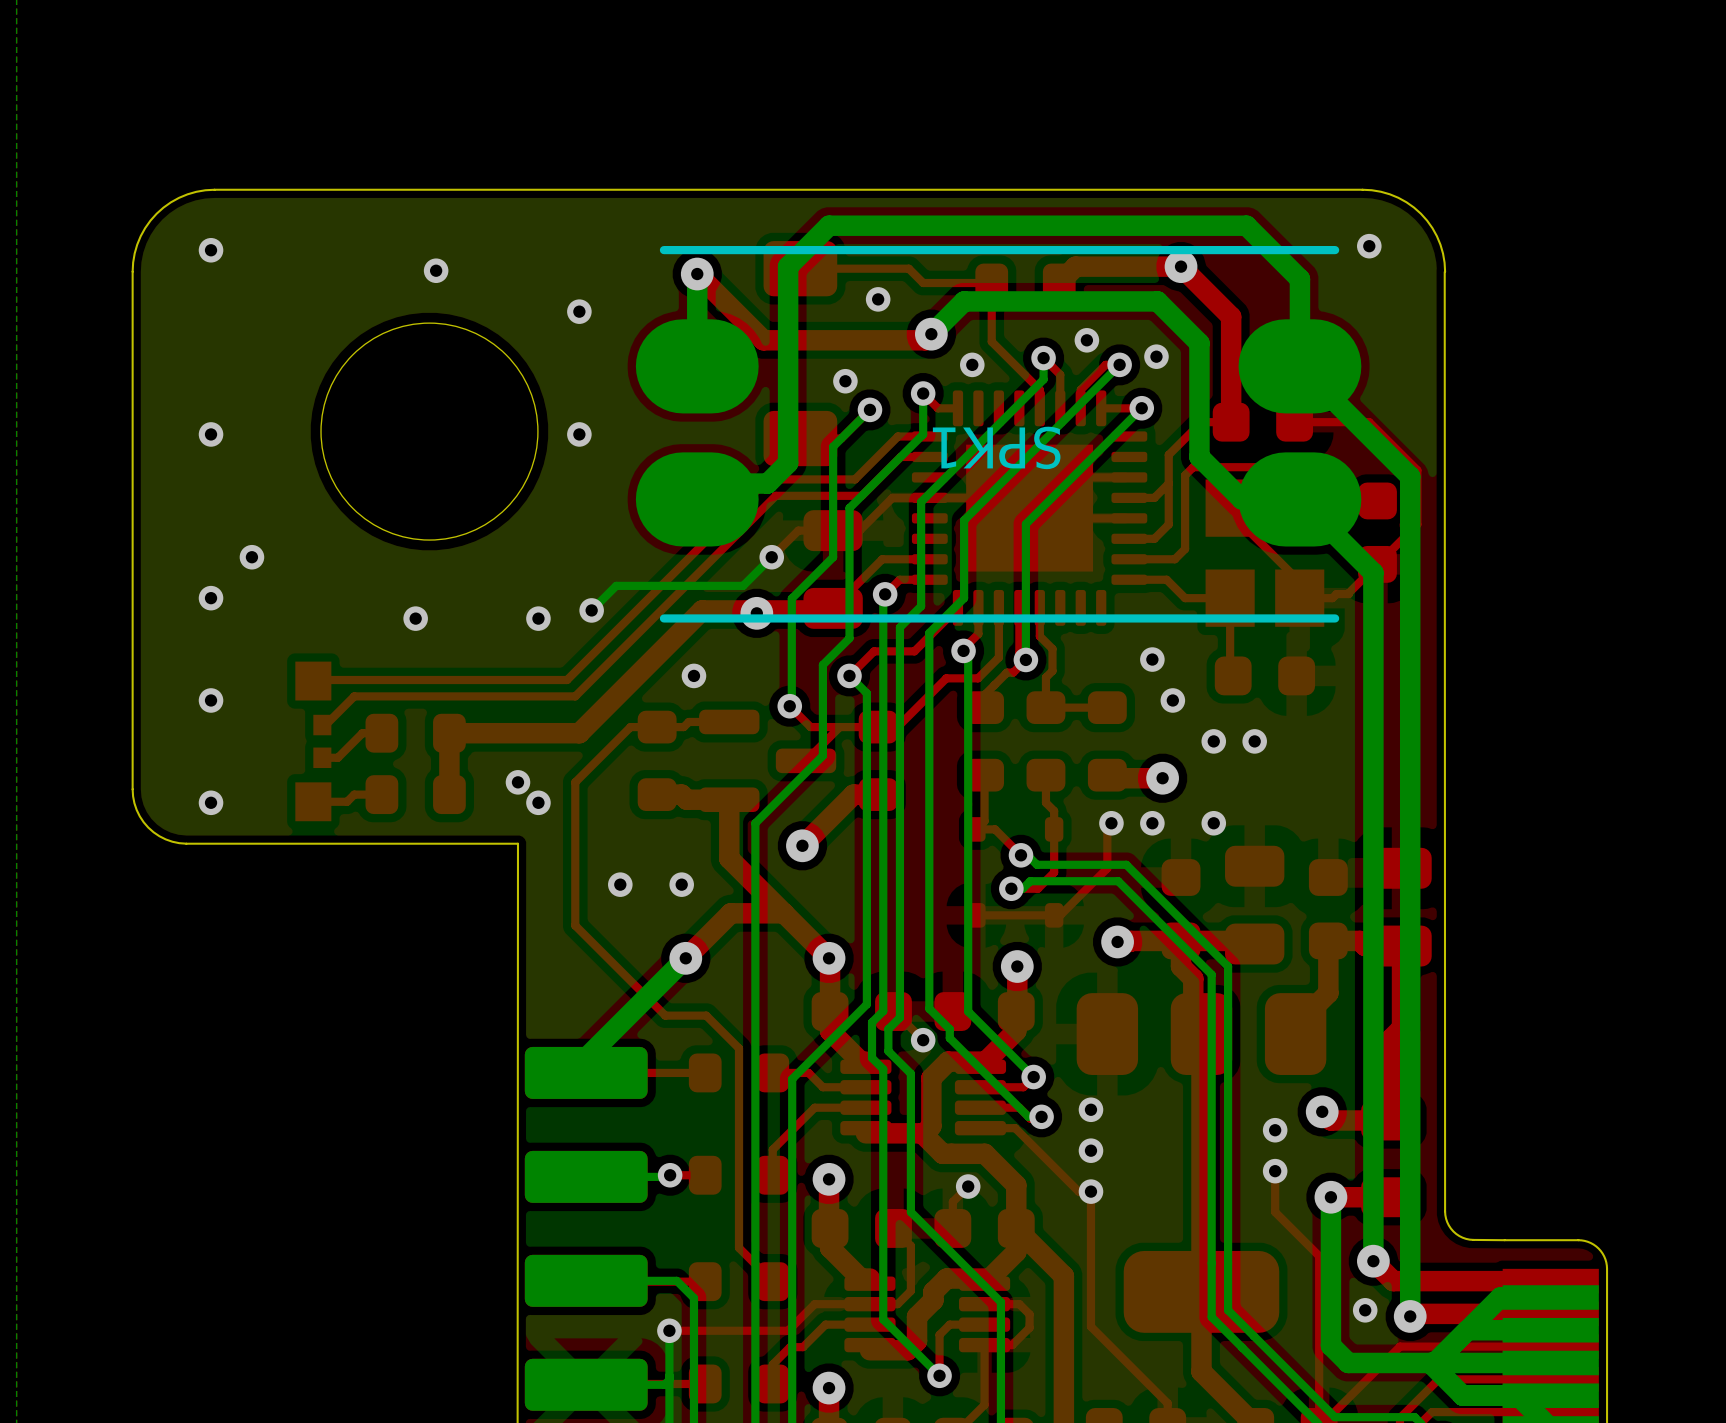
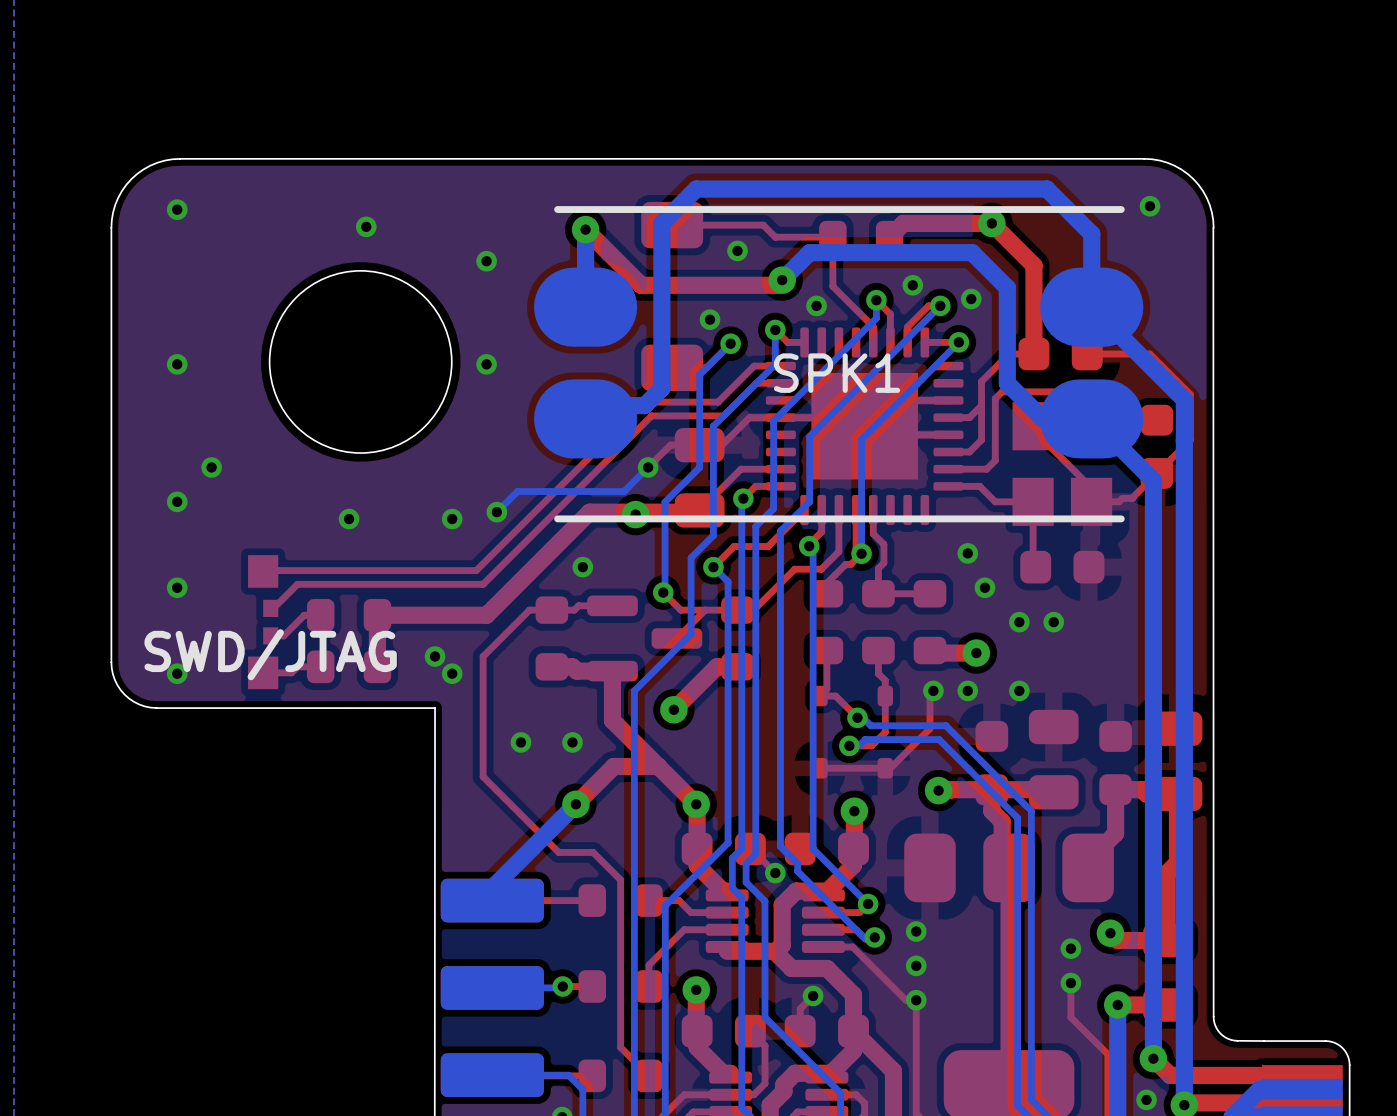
SPK1 name rotation: 0° (996, 447) -> 180° (837, 373)
text: none -> SWD/JTAG (270, 654)

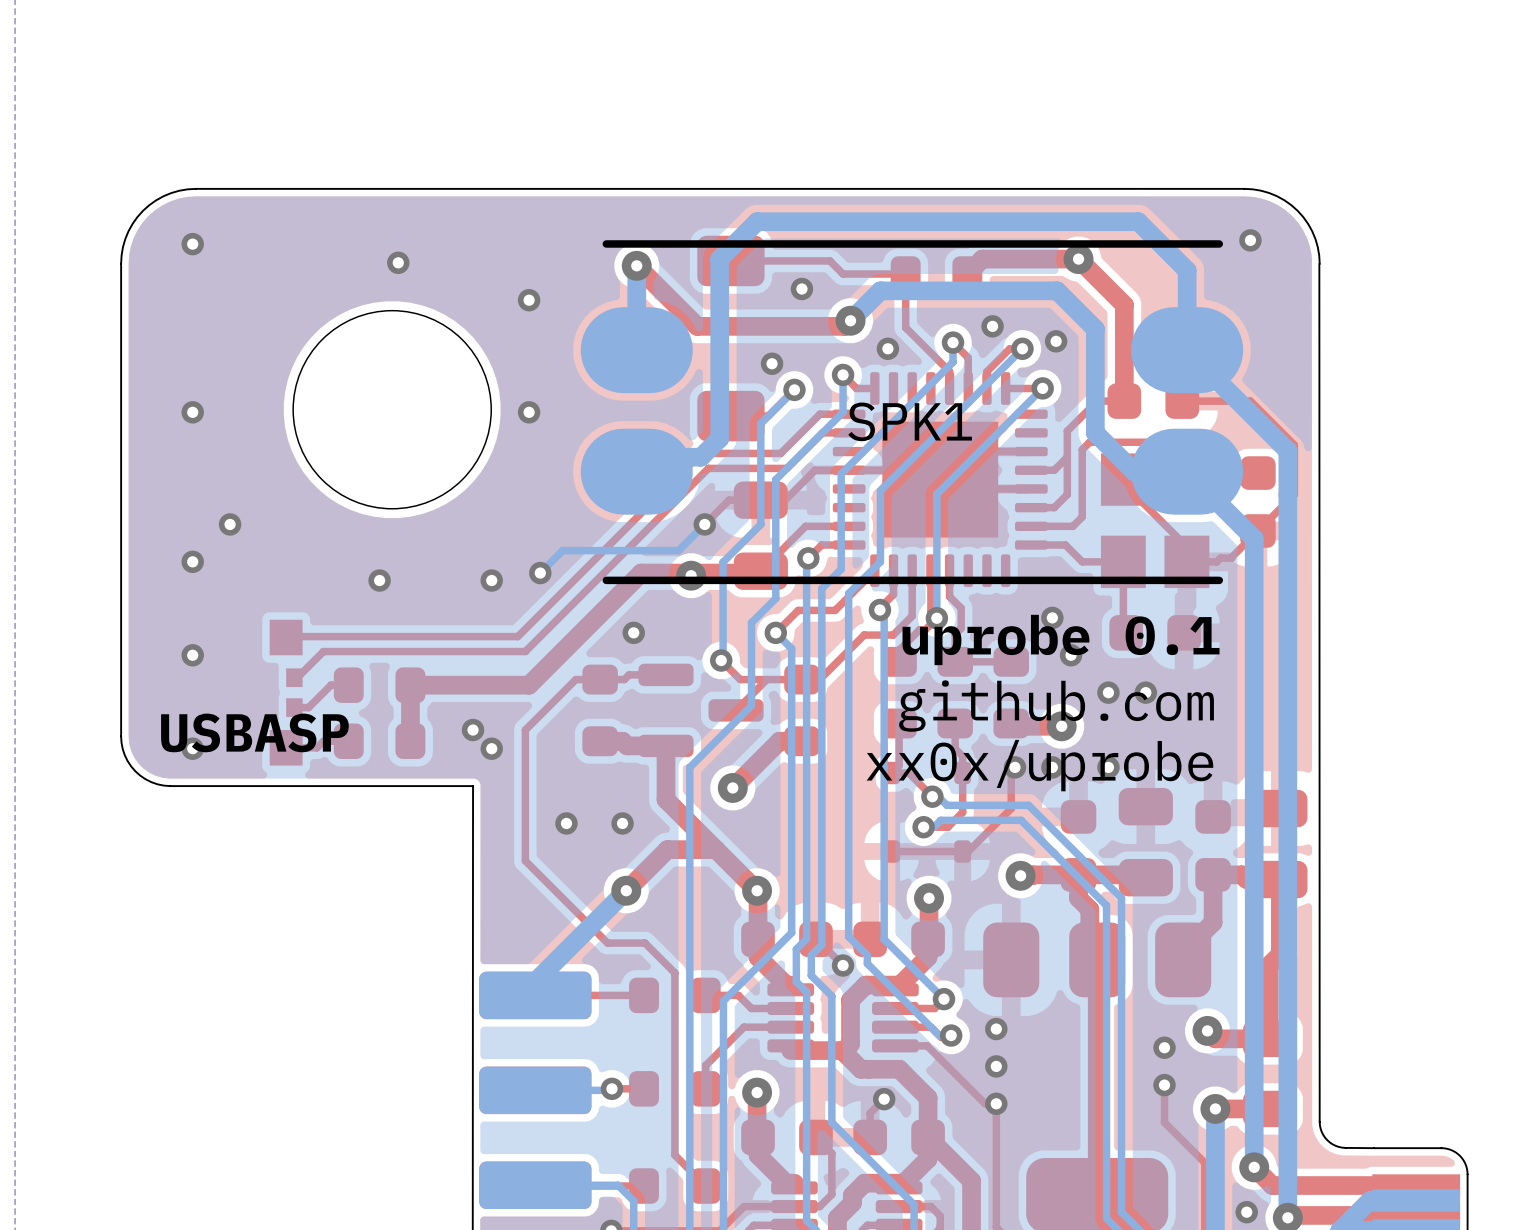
text: none -> uprobe 0.1 (1061, 639)
text: none -> github.com (1056, 706)
text: SWD/JTAG (270, 654) -> USBASP (254, 732)
text: none -> xx0x/uprobe (1039, 765)

